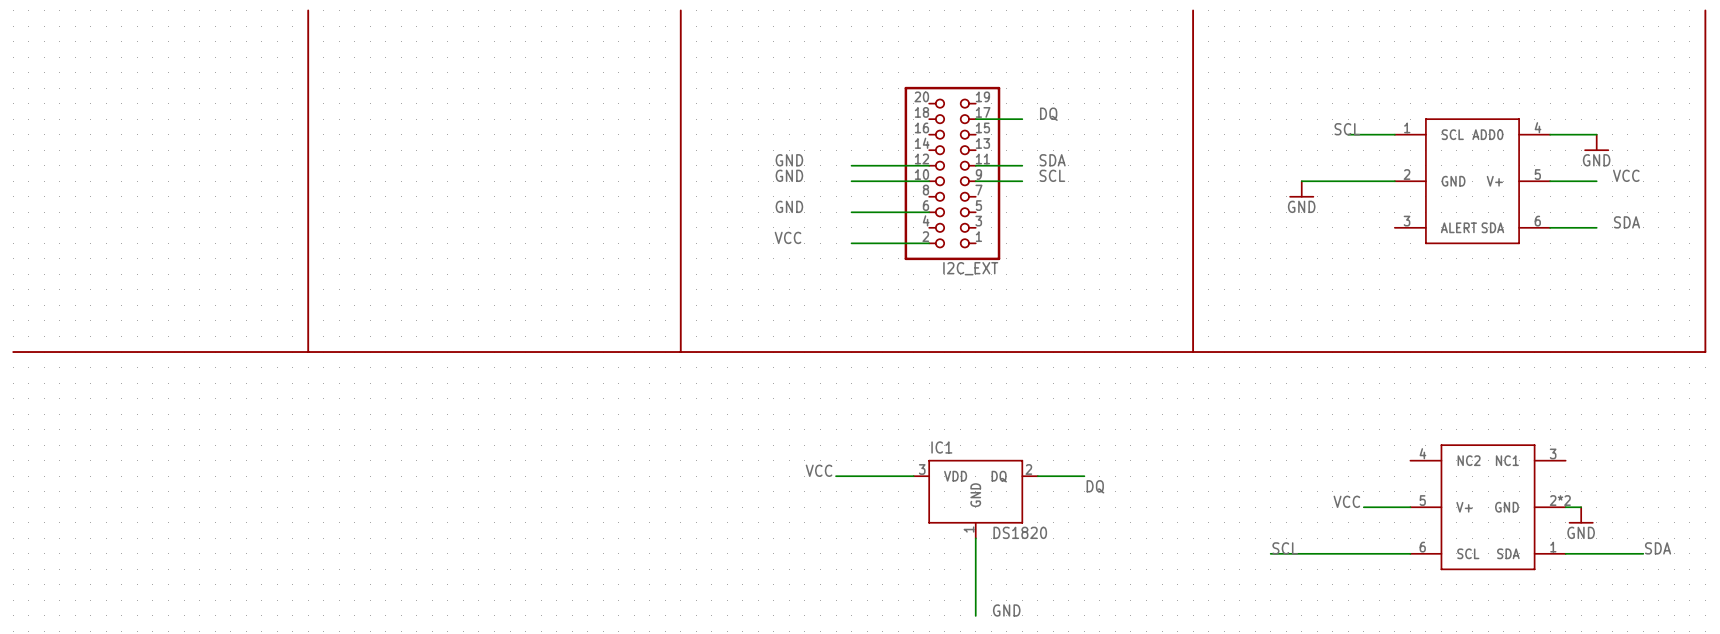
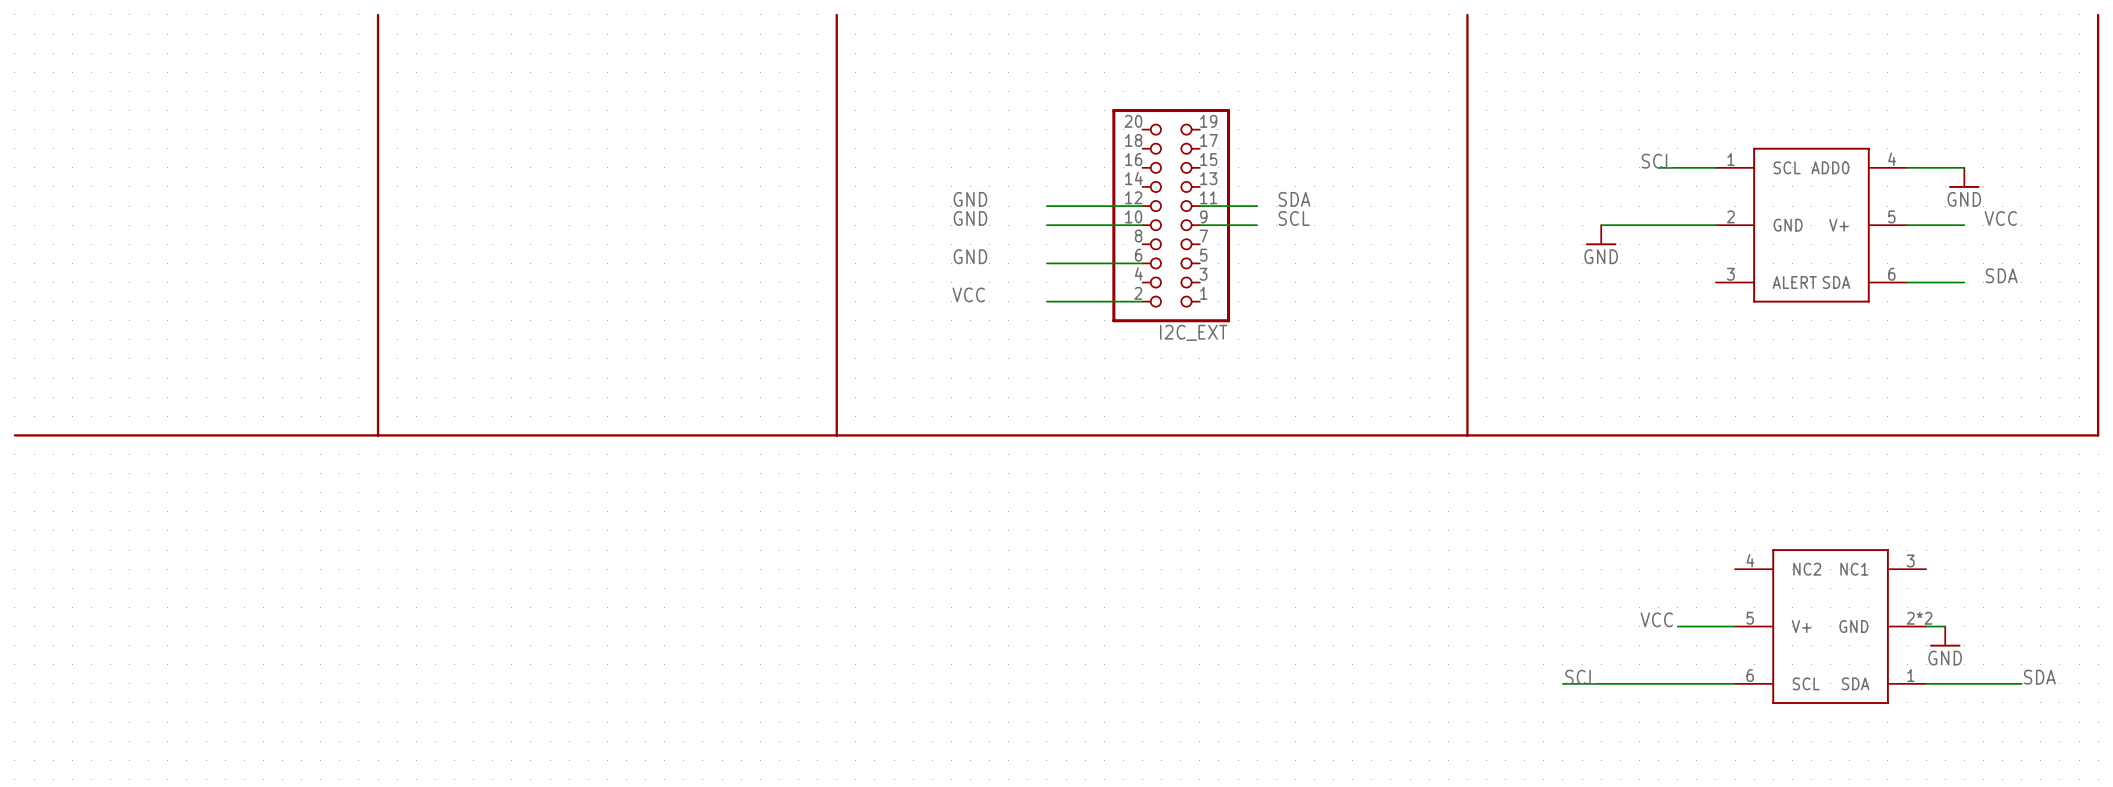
label: DQ (1048, 114) -> none
wire: (975, 119) (1022, 119) -> none
label: VCC (819, 470) -> none
wire: (836, 476) (913, 476) -> none
wire: (1037, 476) (1084, 476) -> none
label: DQ (1095, 486) -> none
IC1: DS1820 (975, 499) -> none
wire: (975, 538) (975, 615) -> none
label: GND (1006, 610) -> none

